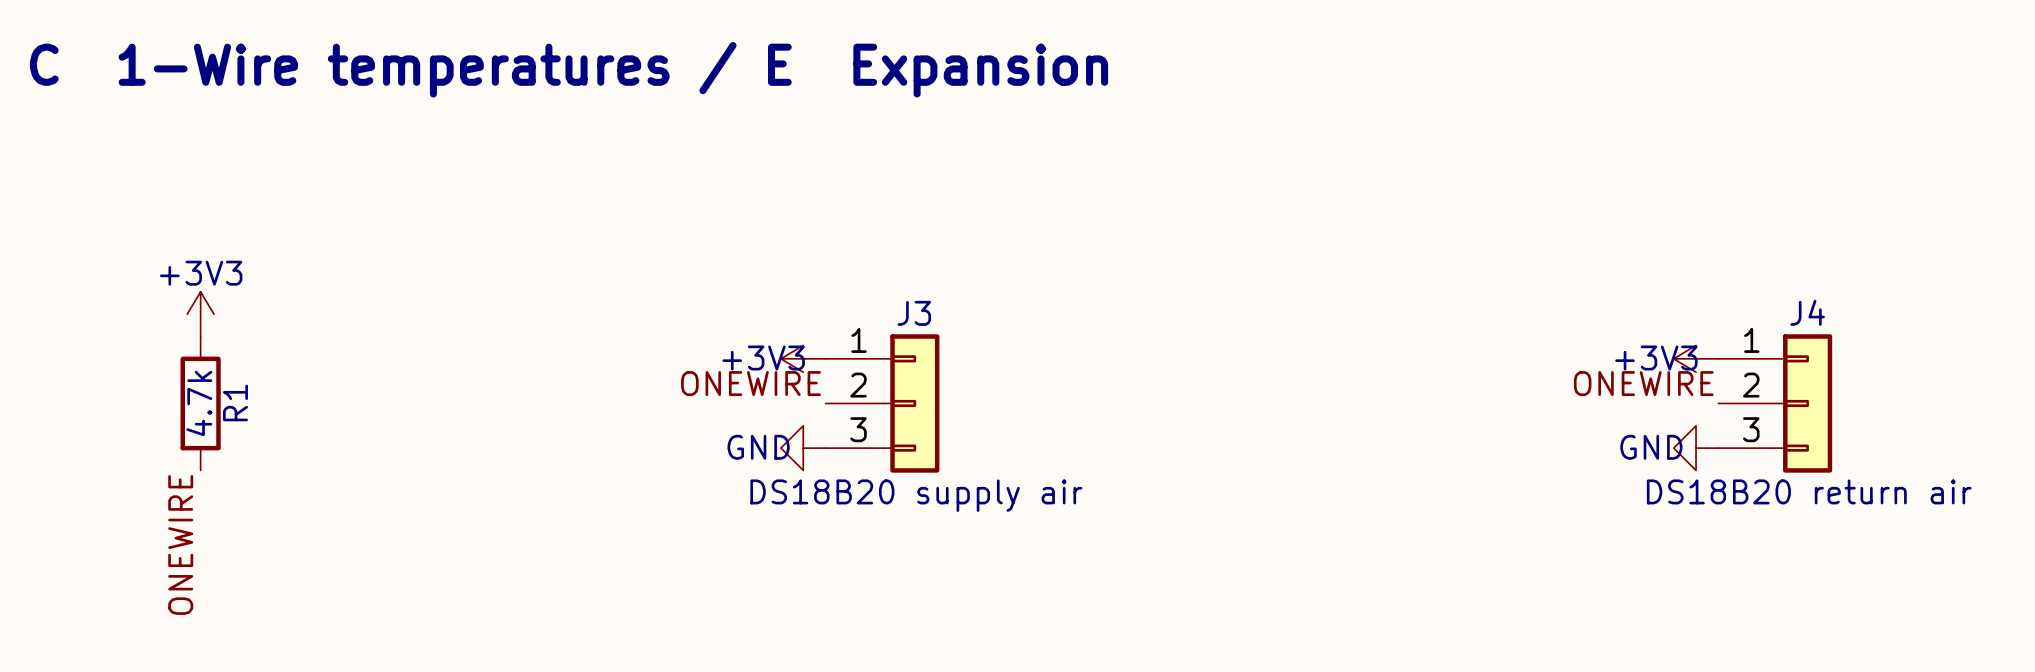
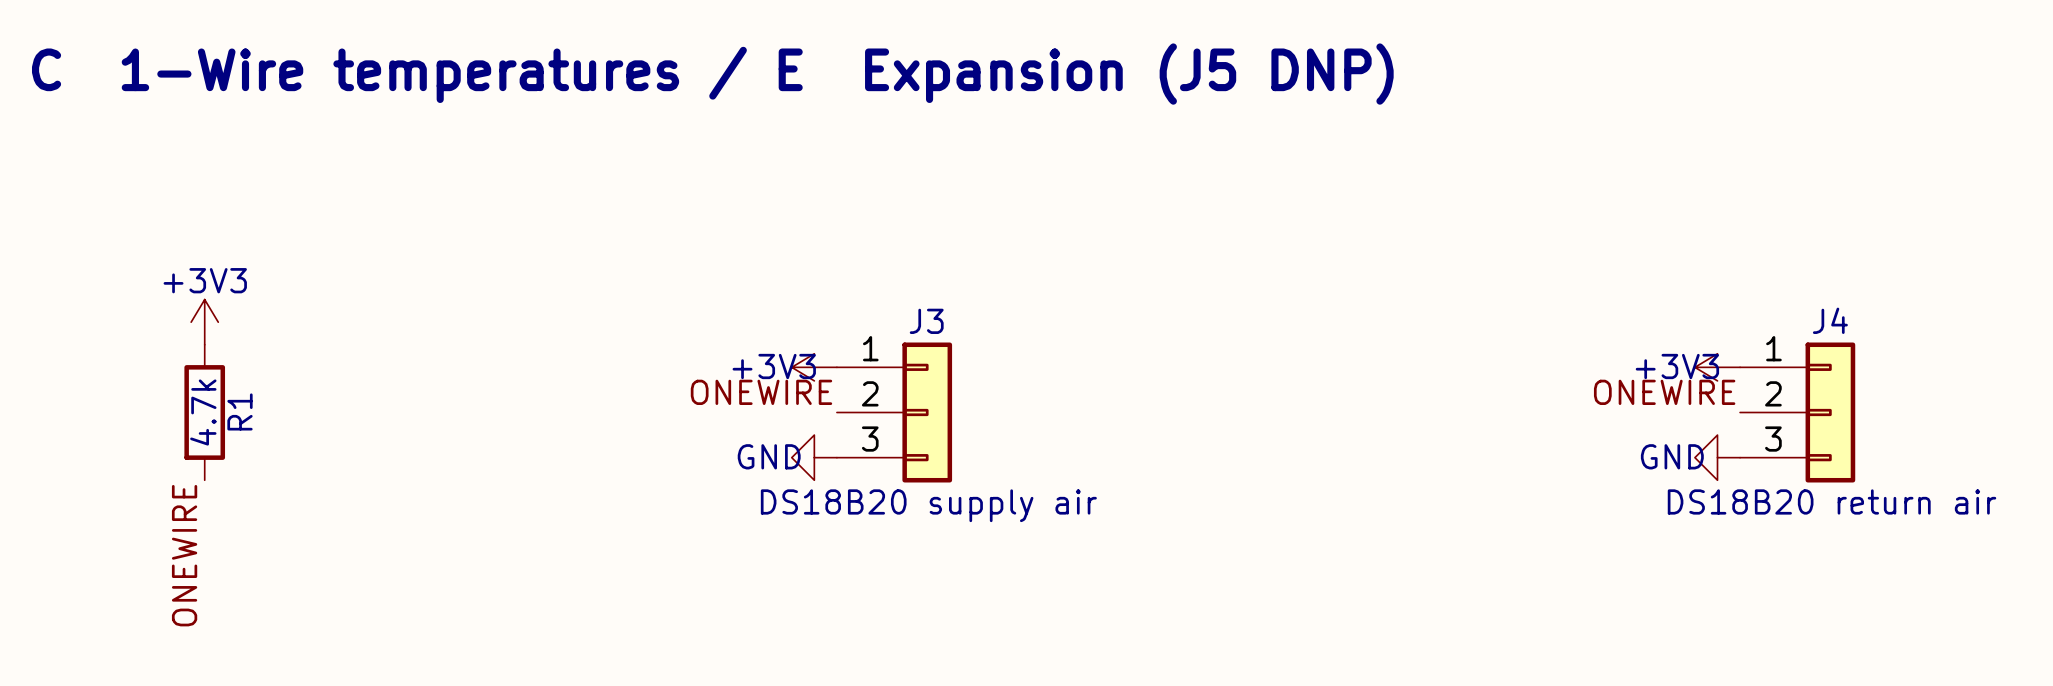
text: C 1-Wire temperatures / E Expansion (568, 69) -> C 1-Wire temperatures / E Expansion (J5 DNP) (712, 74)

